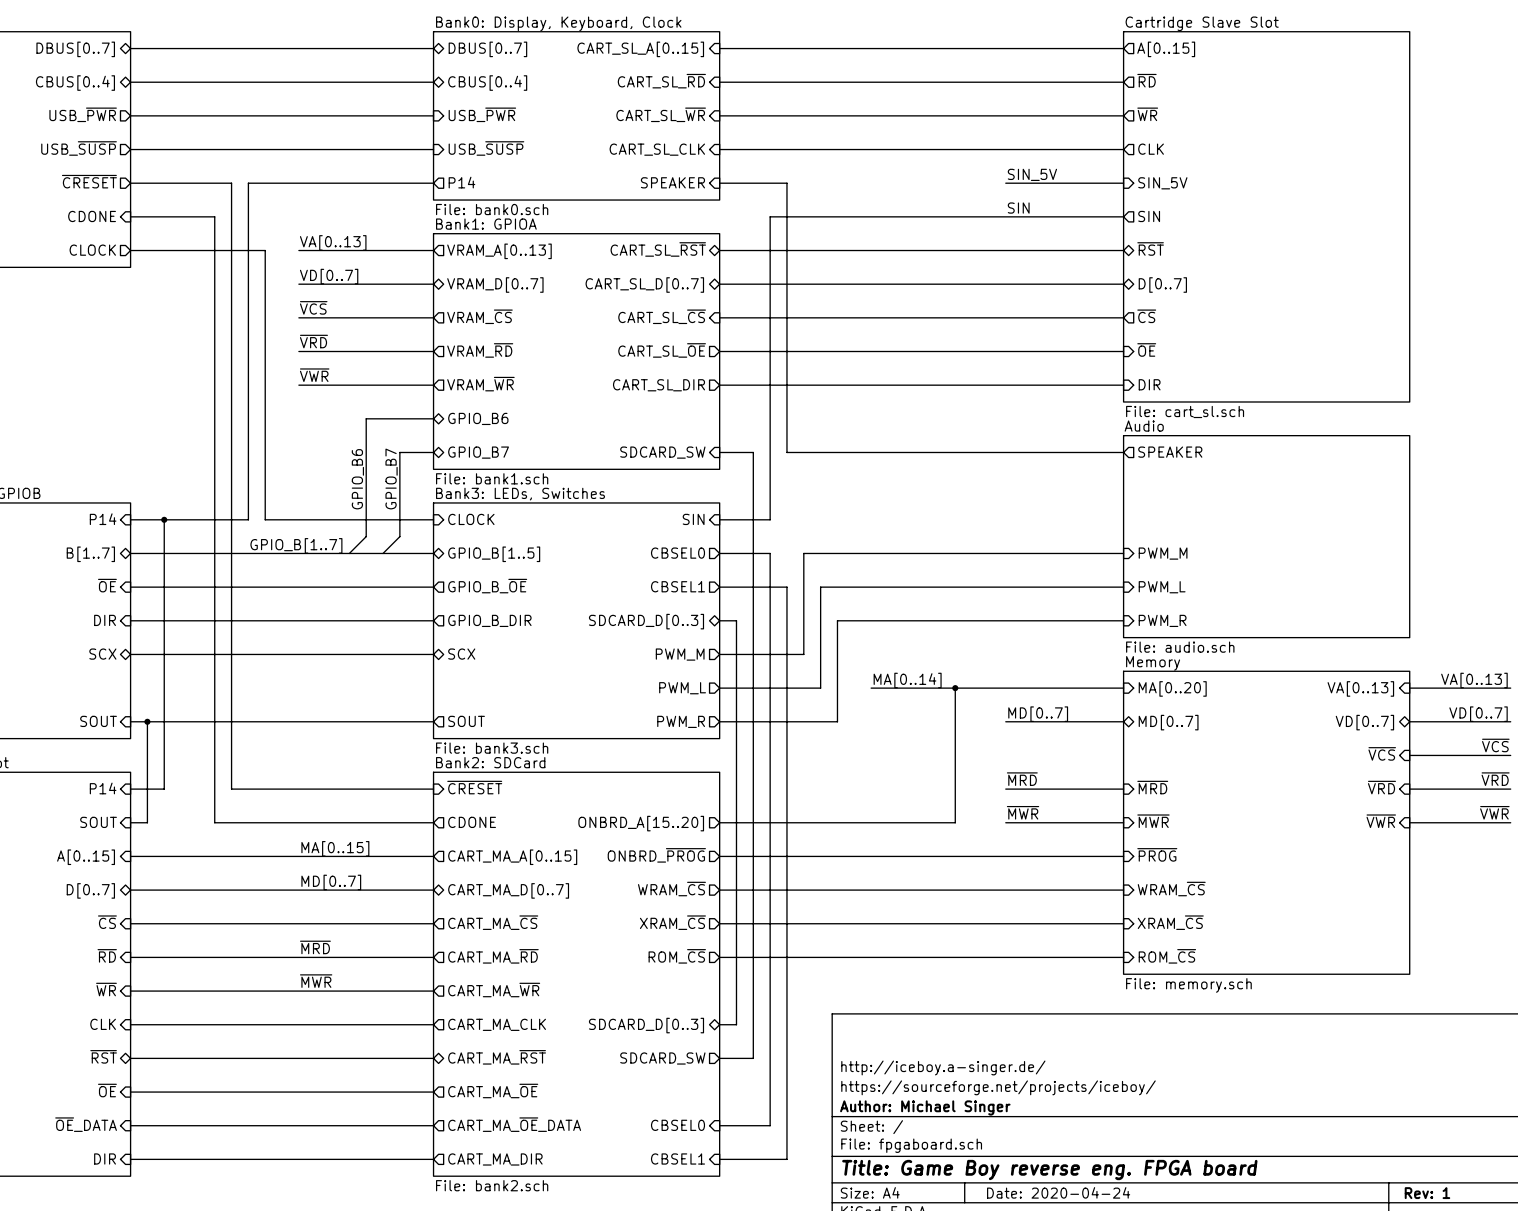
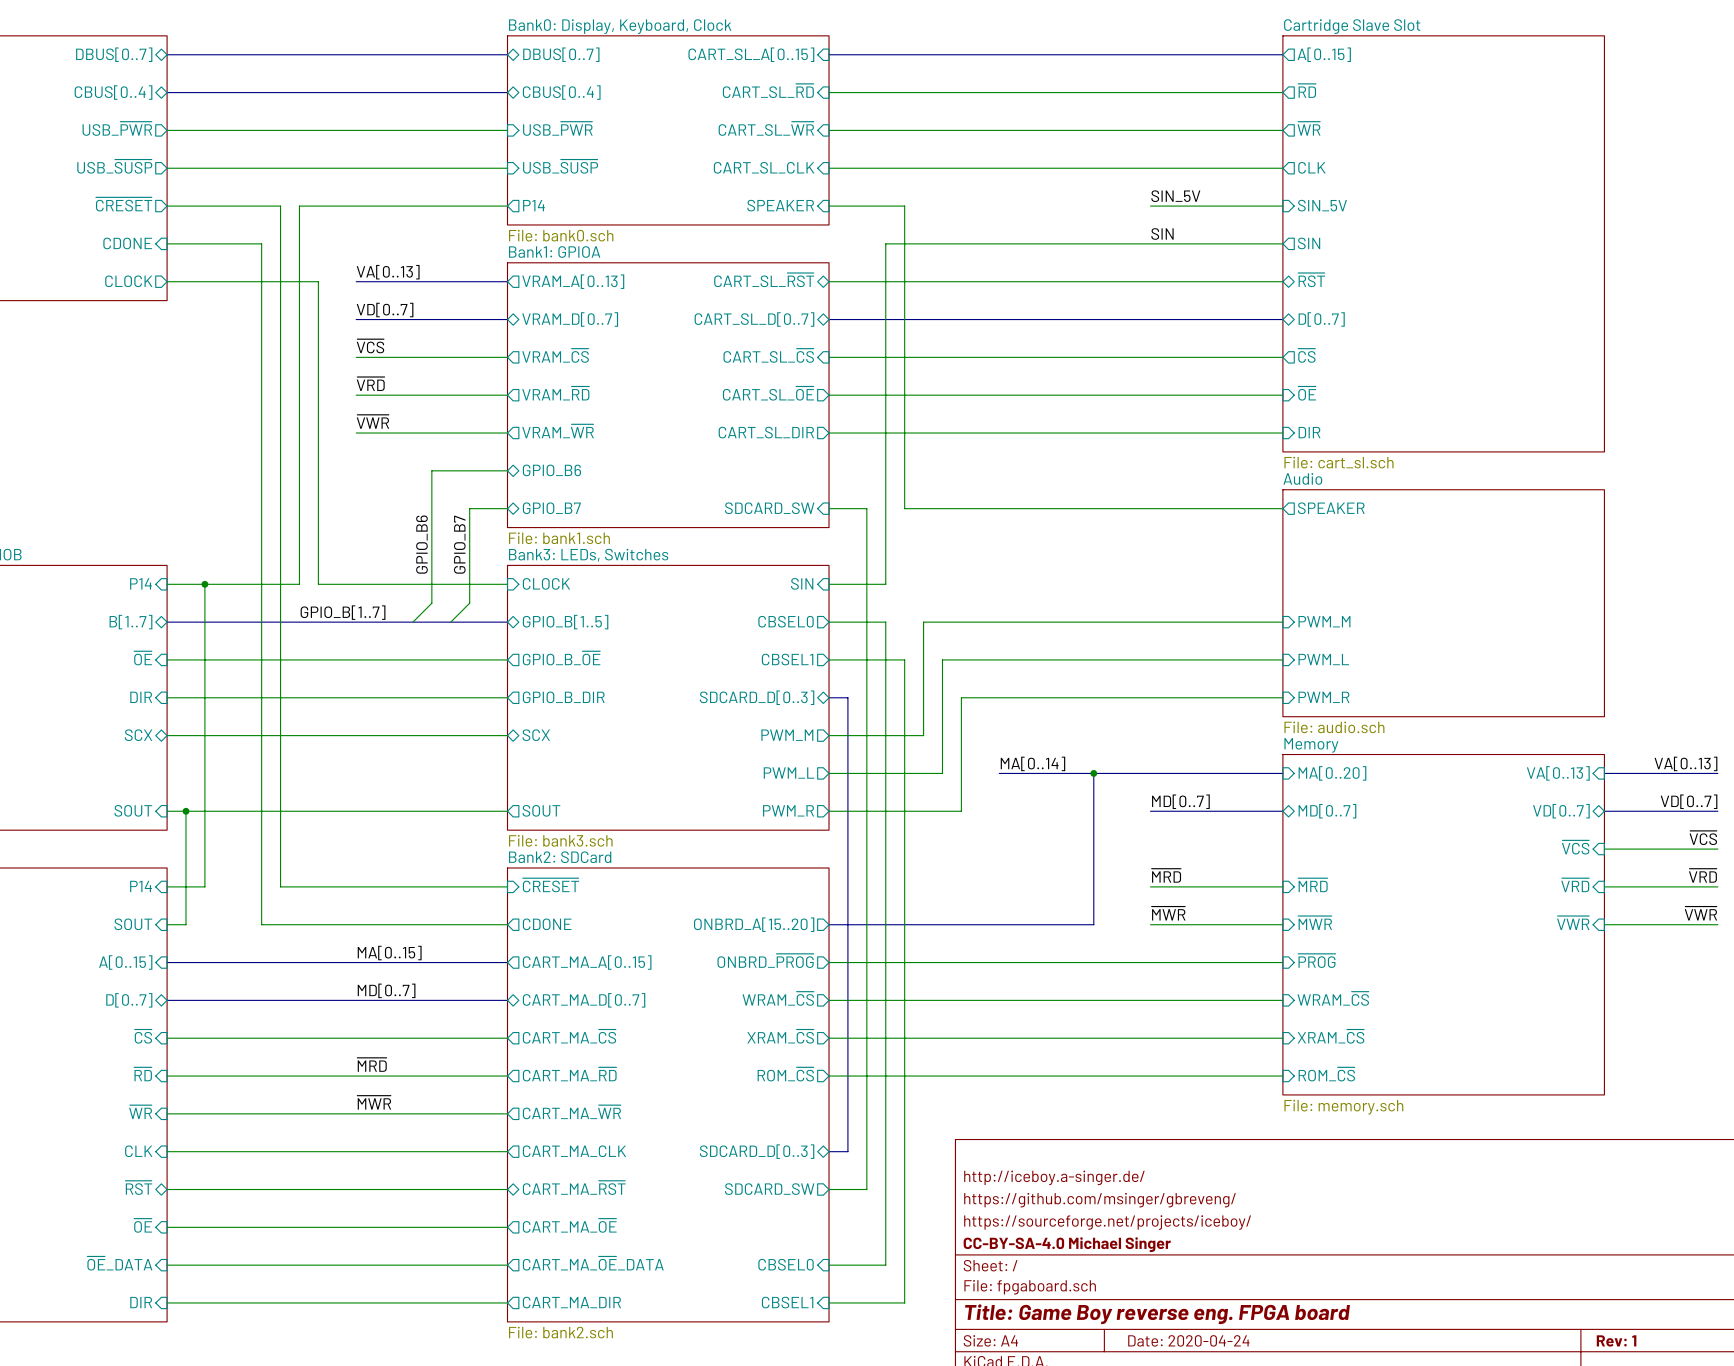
title block: none -> http://iceboy.a-singer.de/ (1054, 1177)
title block: http://iceboy.a-singer.de/ (943, 1067) -> https://github.com/msinger/gbreveng/ (1100, 1200)
title block: Author: Michael Singer (925, 1107) -> CC-BY-SA-4.0 Michael Singer (1067, 1244)

